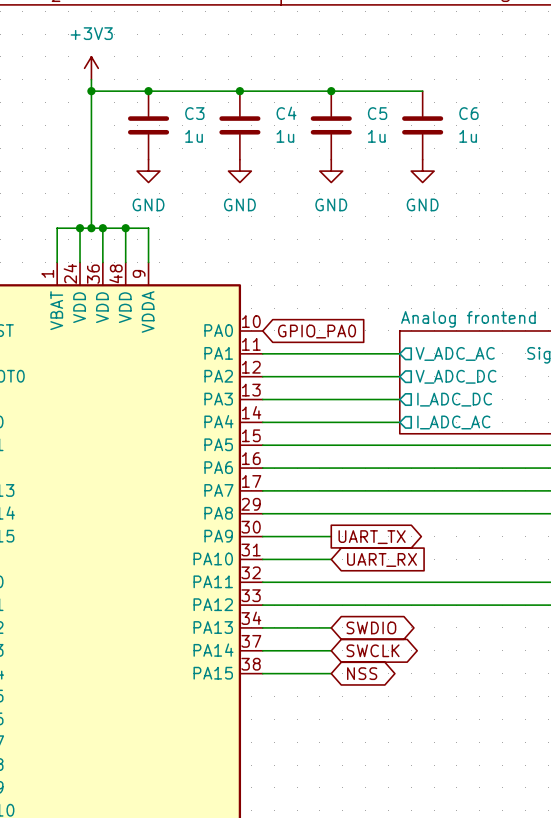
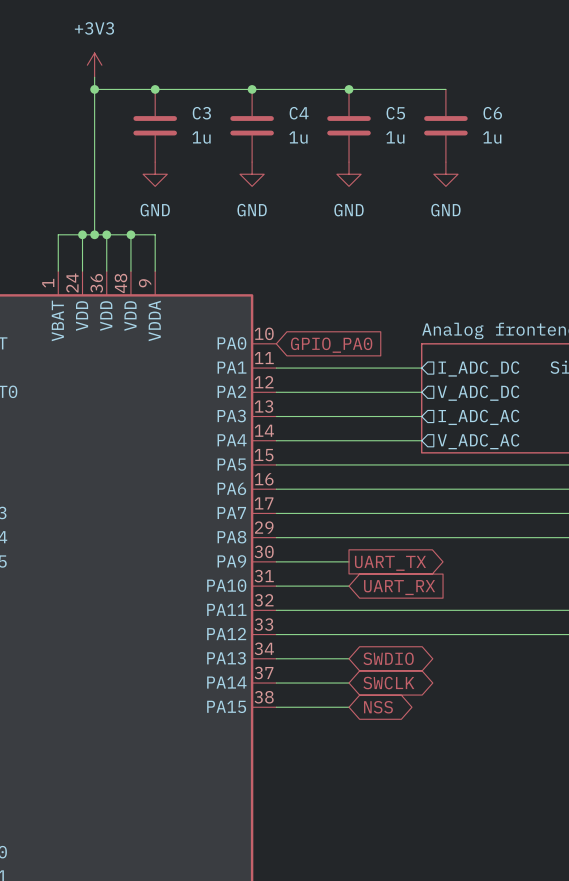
sheet pin: V_ADC_AC (455, 353) -> I_ADC_DC (478, 368)
sheet pin: I_ADC_DC (454, 399) -> I_ADC_AC (478, 417)
sheet pin: I_ADC_AC (453, 422) -> V_ADC_AC (478, 441)

